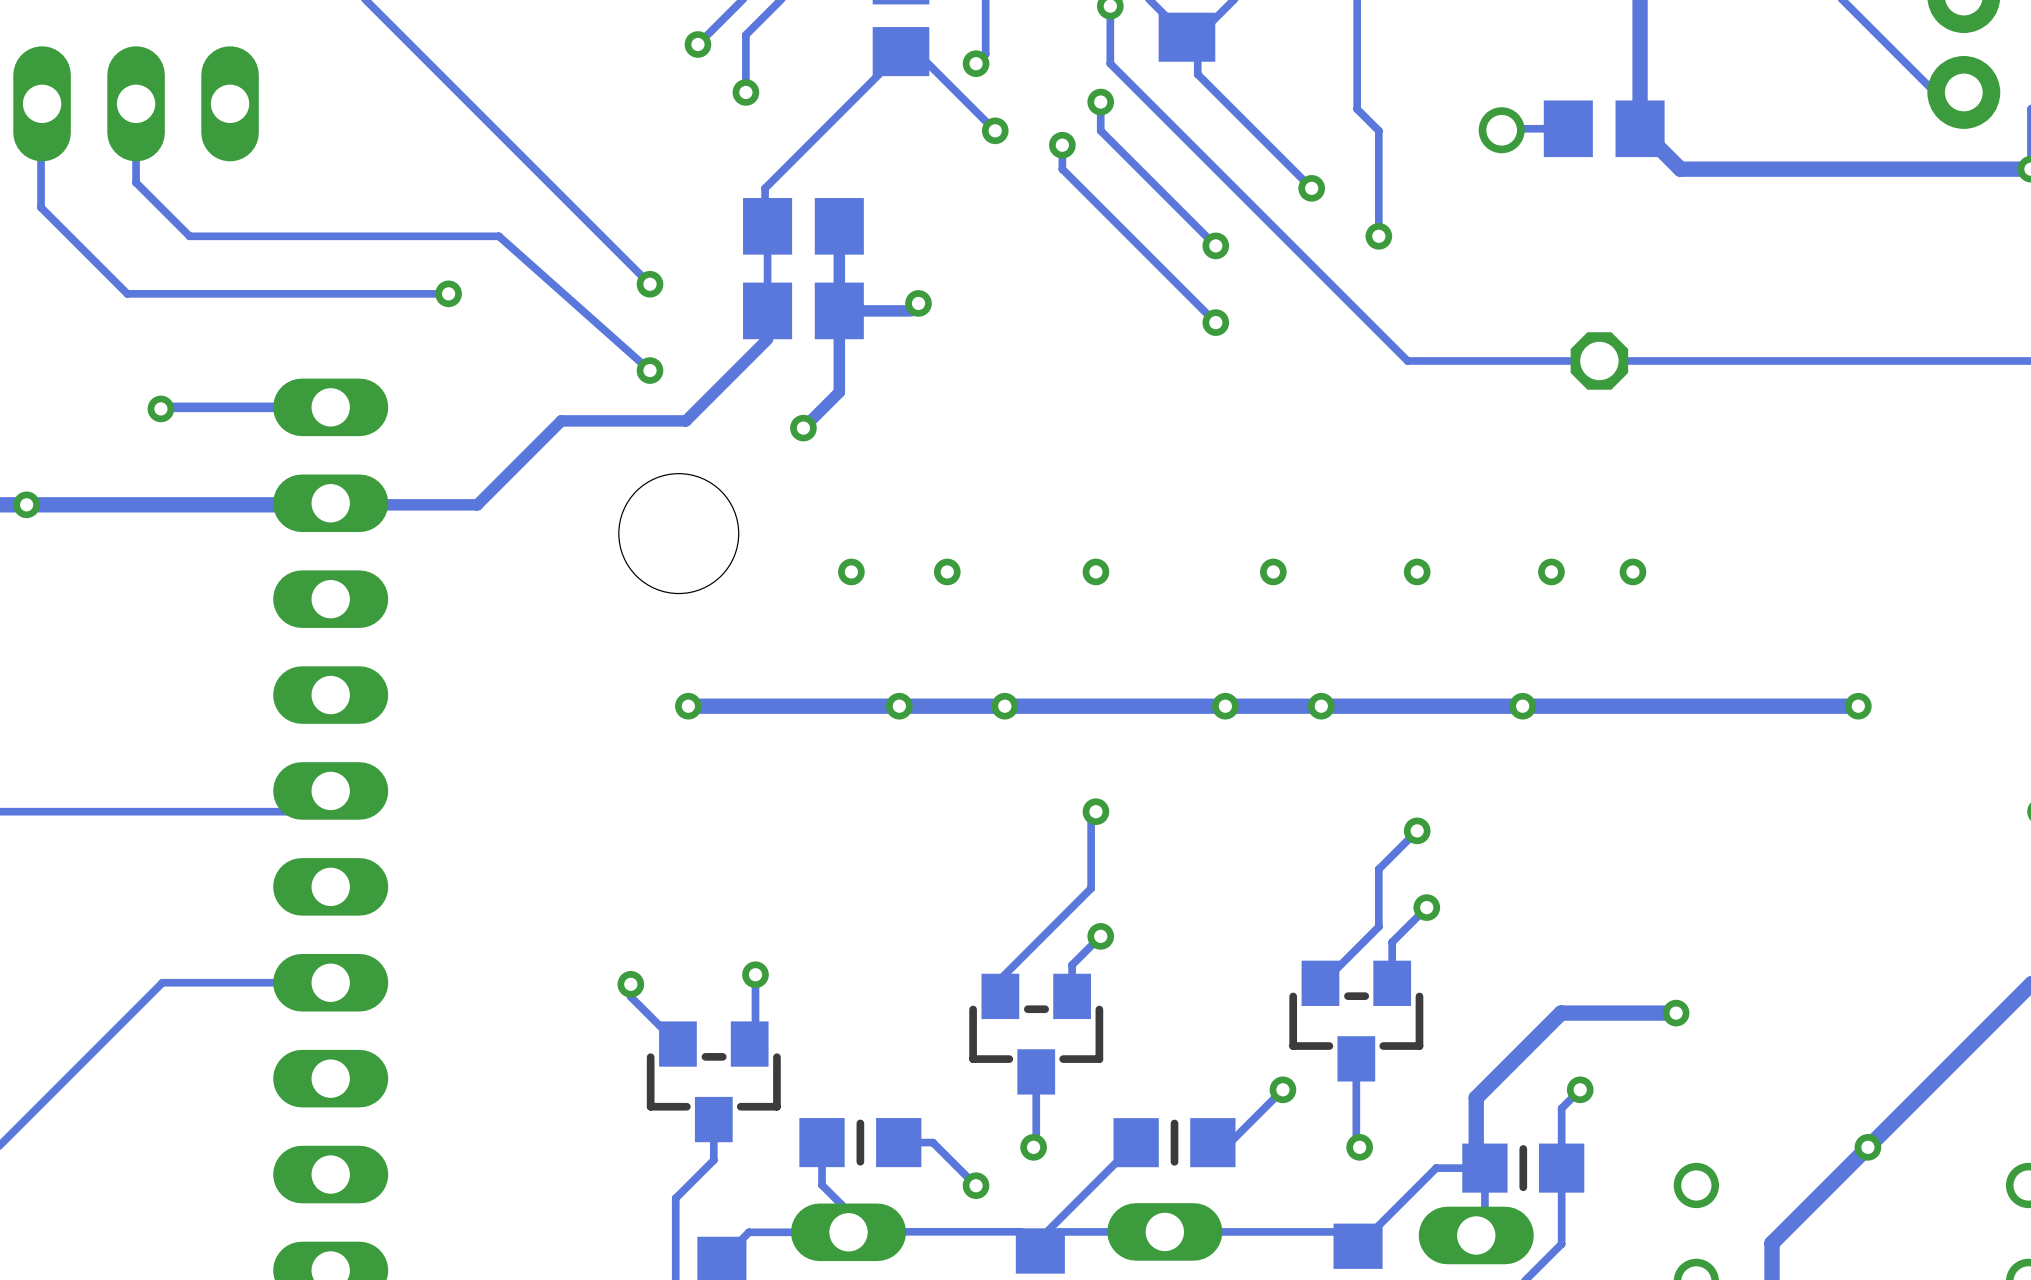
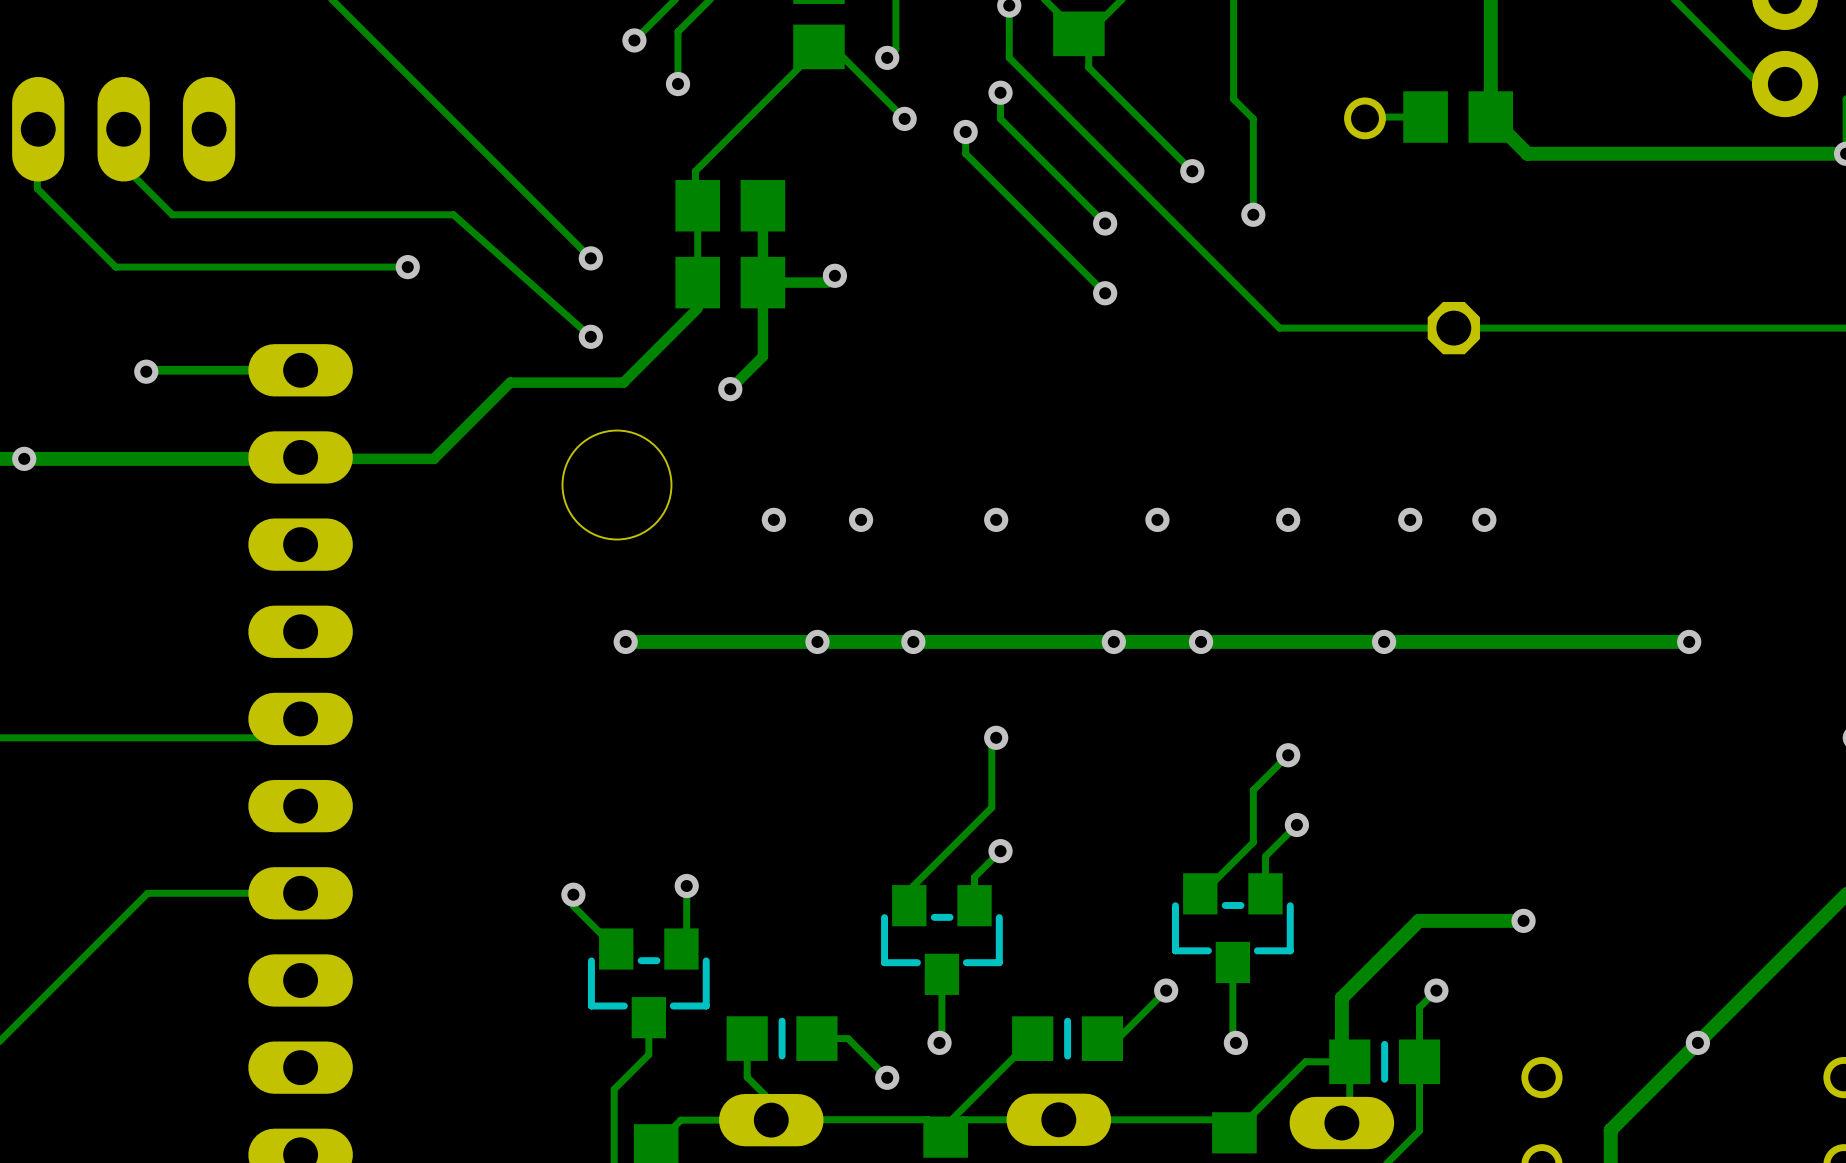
part position: (136, 103) -> (123, 129)

